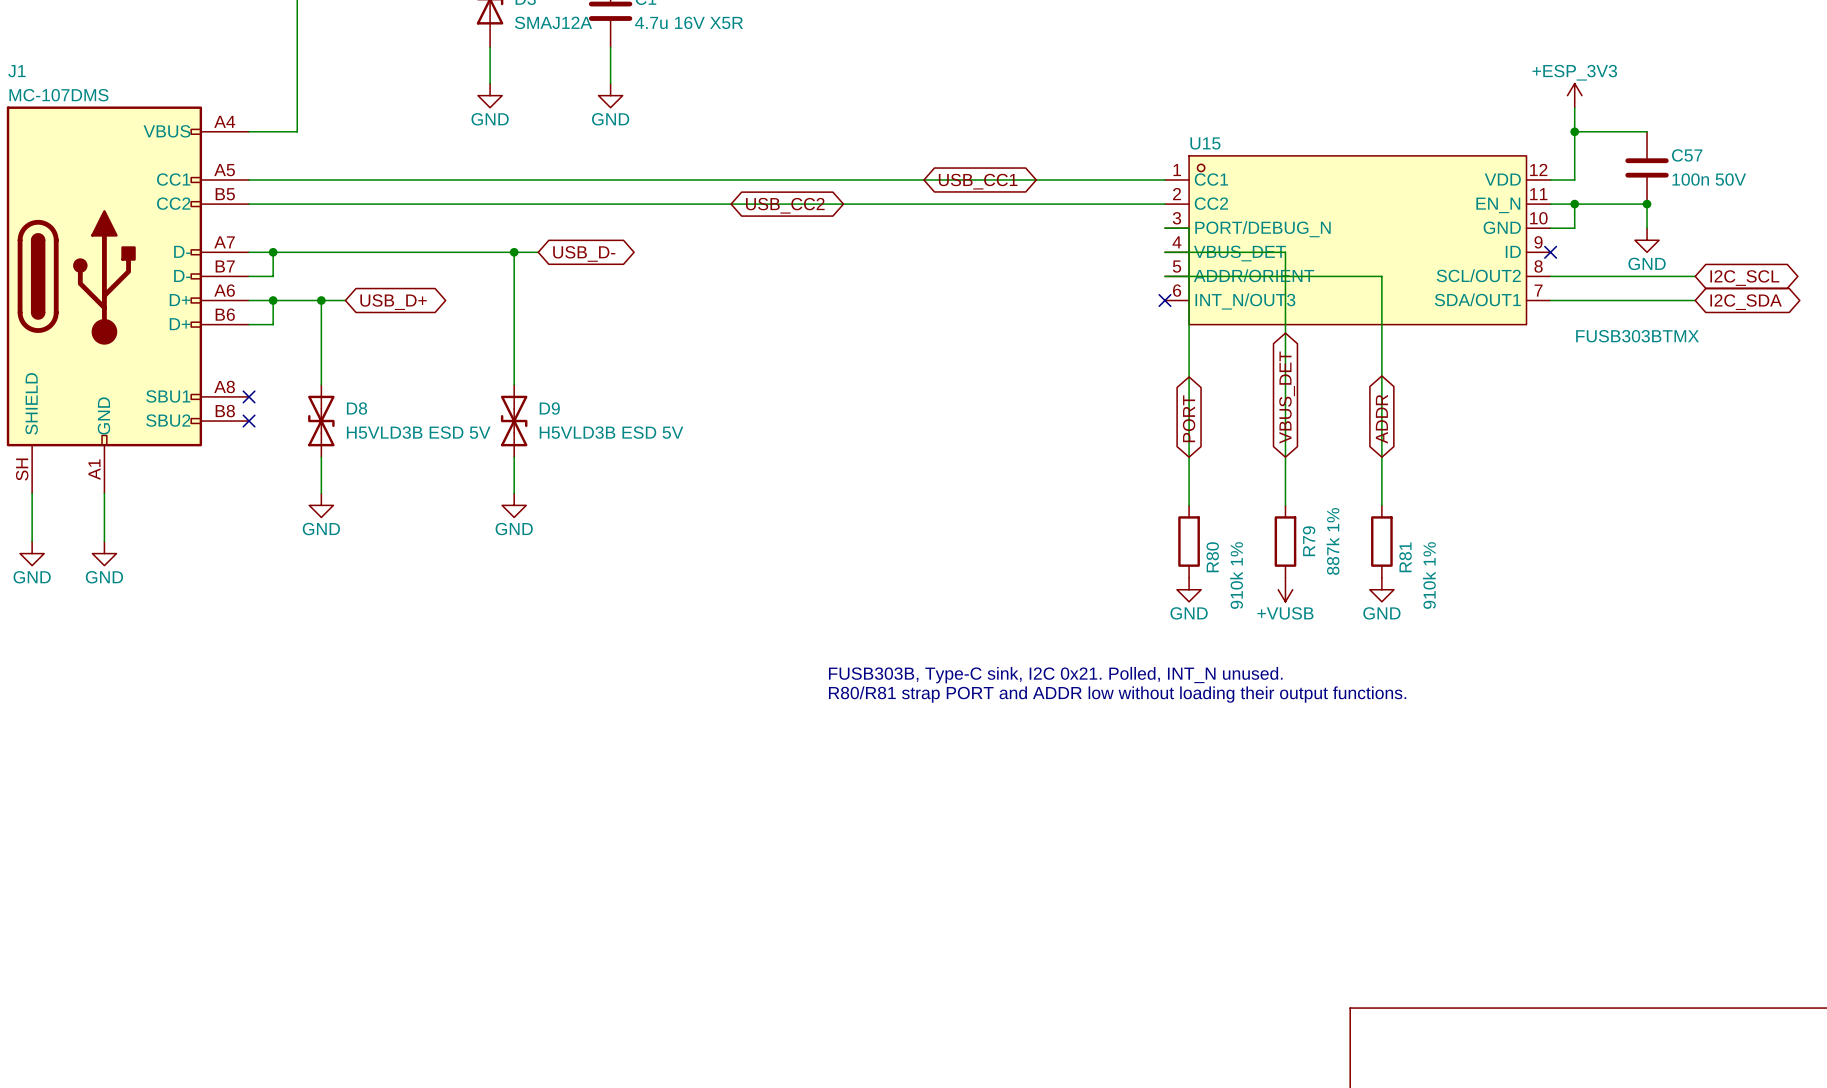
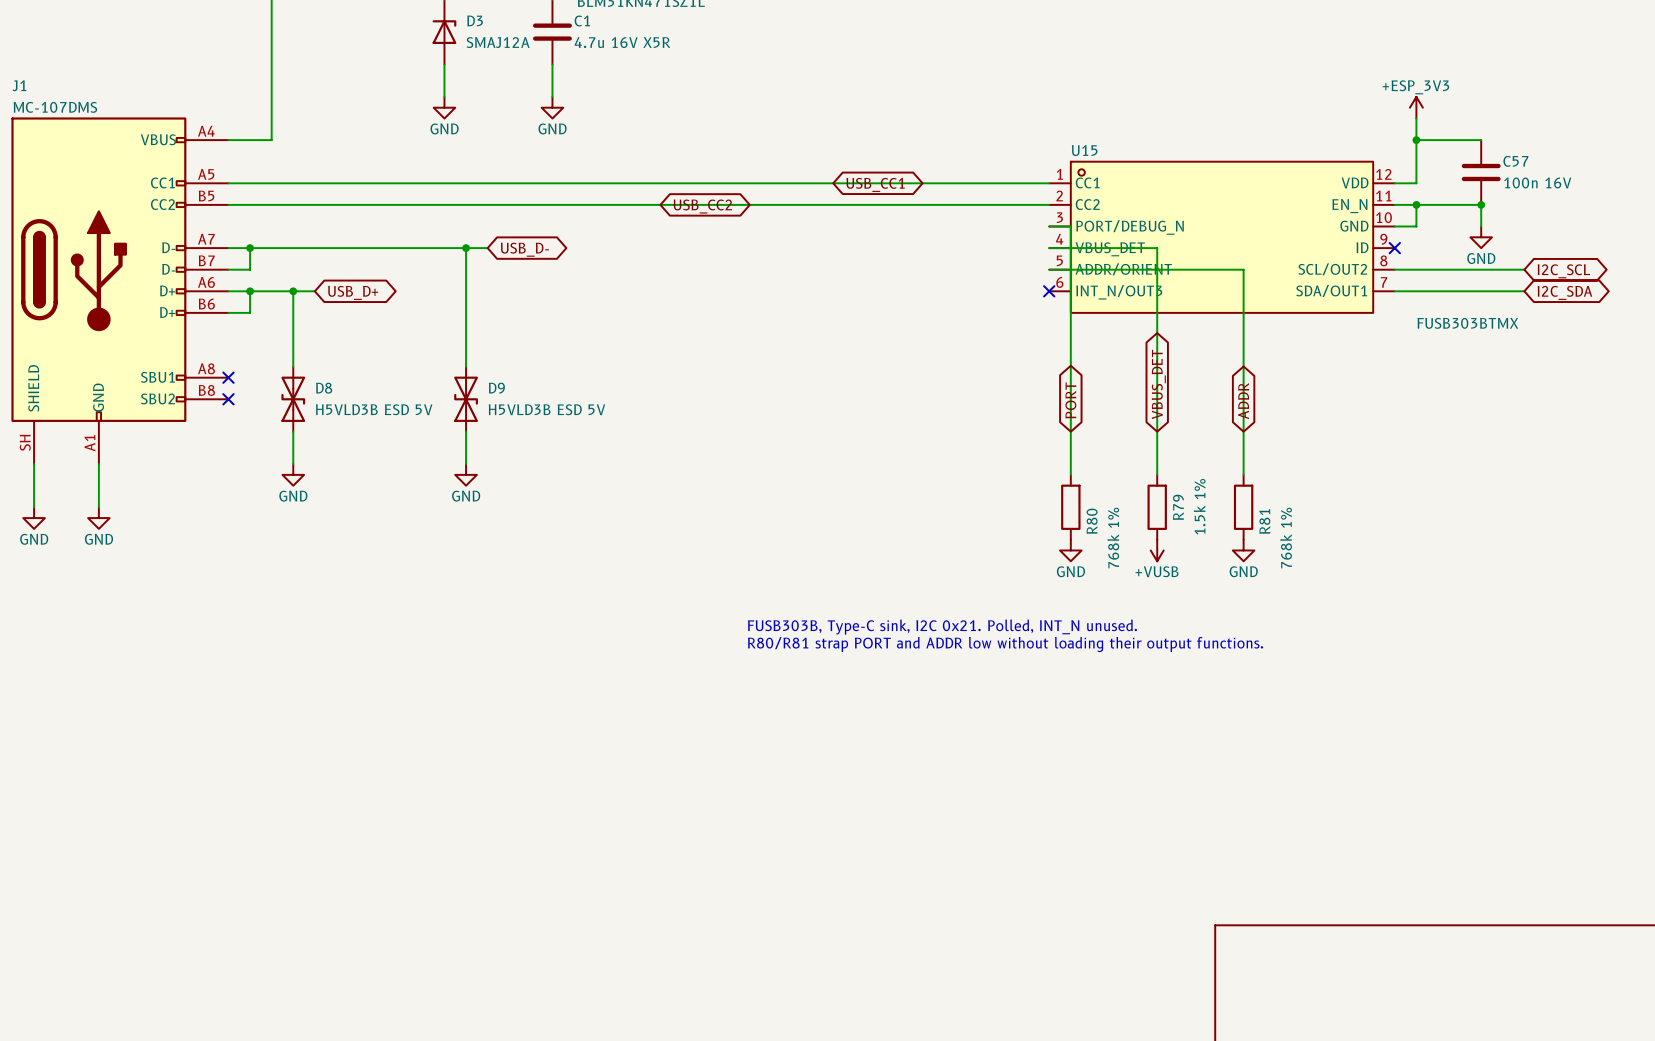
C57 value: 100n 50V (1709, 179) -> 100n 16V (1537, 182)
R79 value: 887k 1% (1332, 541) -> 1.5k 1% (1199, 506)
R80 value: 910k 1% (1236, 575) -> 768k 1% (1113, 538)
R81 value: 910k 1% (1429, 575) -> 768k 1% (1286, 538)

